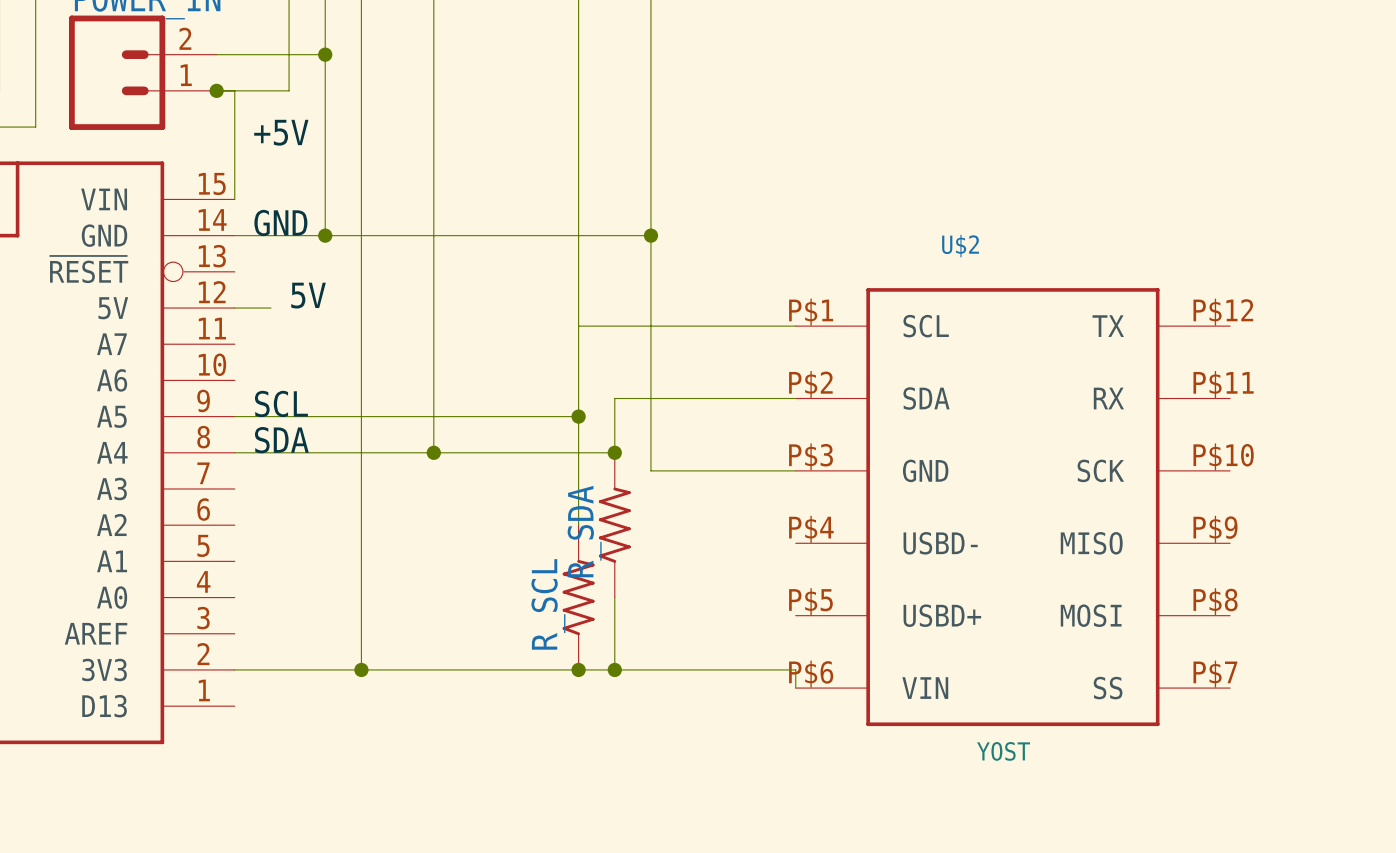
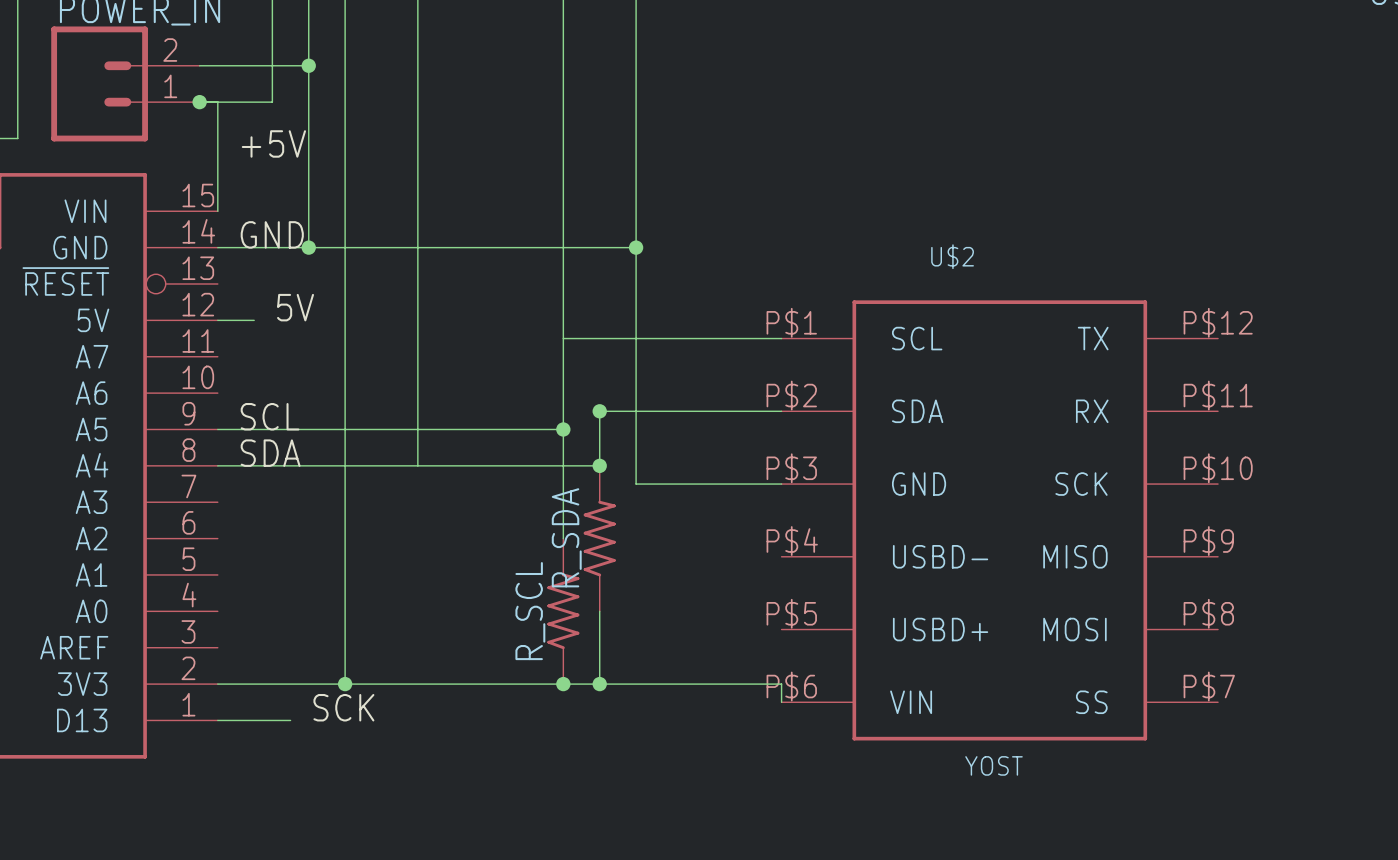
junction: none -> (599, 411)
junction: (433, 452) -> none
label: none -> SCK (343, 707)
wire: none -> (217, 720) (290, 720)

